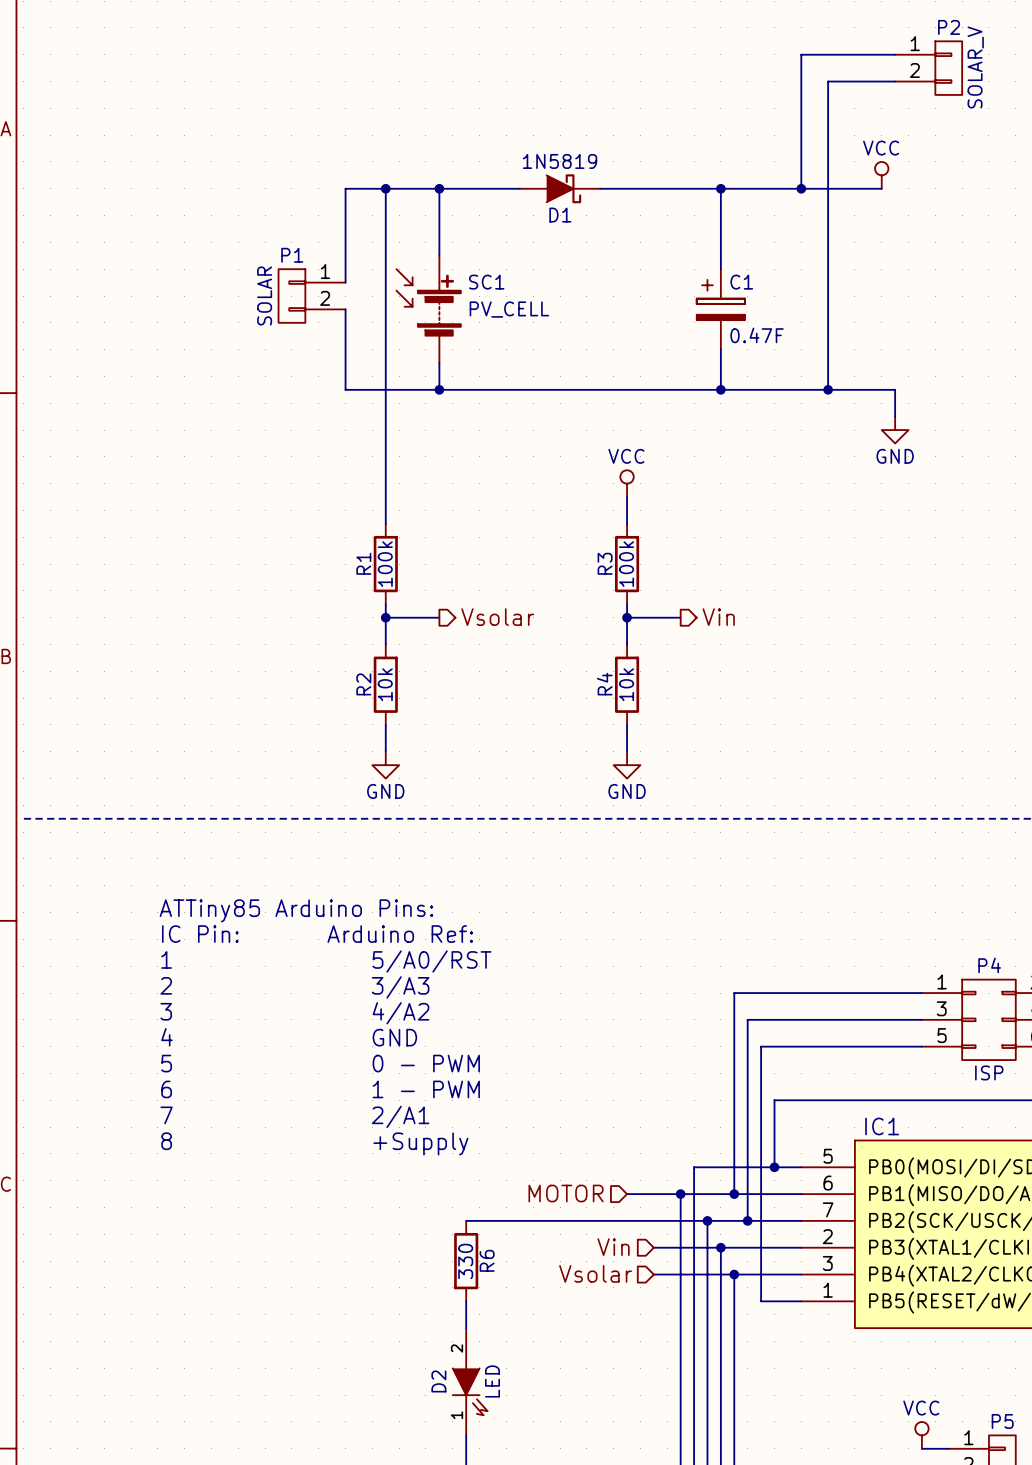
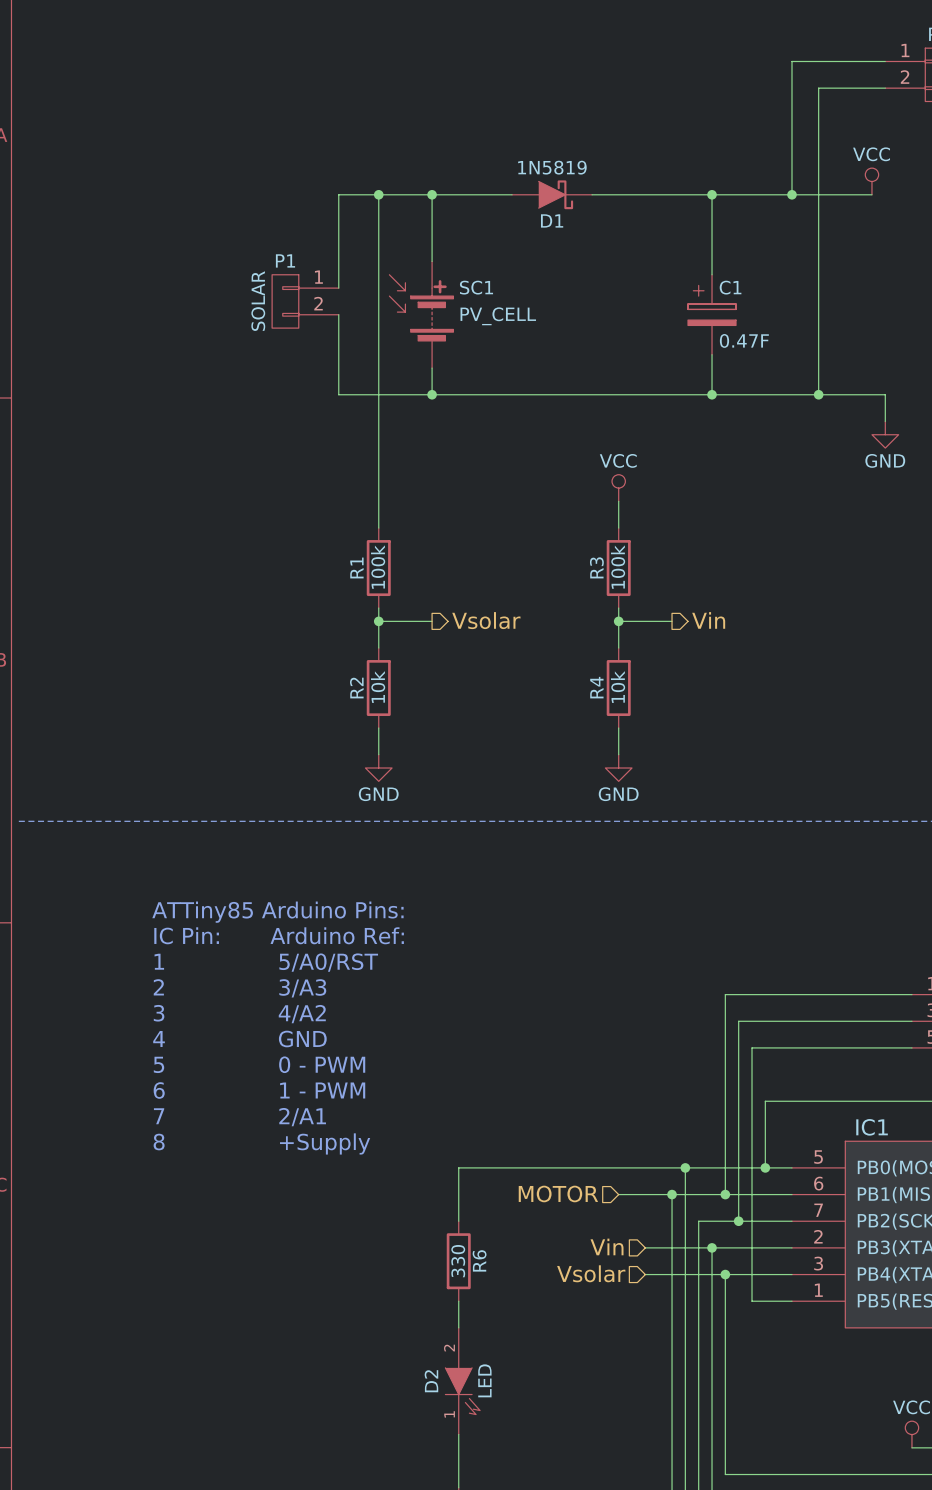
wire: (466, 1220) (707, 1220) -> (458, 1221) (458, 1167) (685, 1167)
junction position: (707, 1220) -> (685, 1167)

